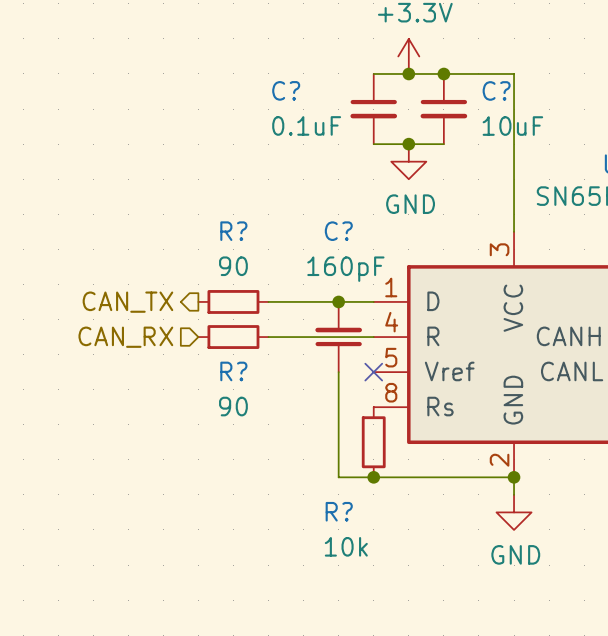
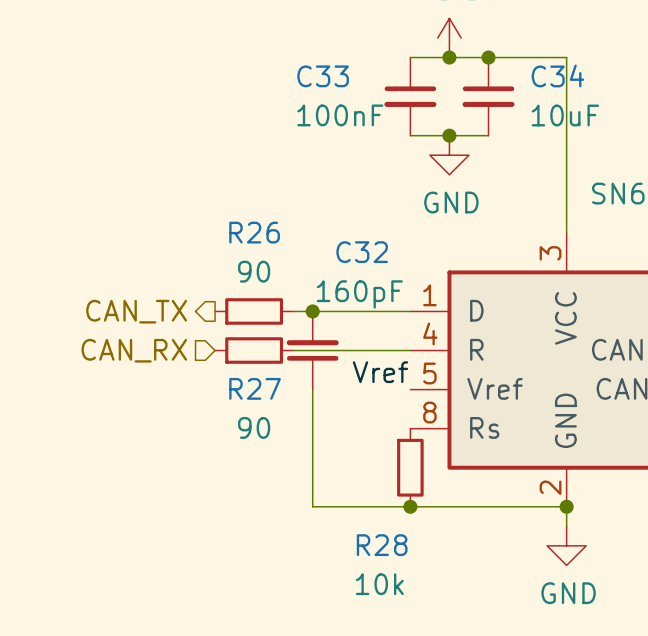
C? name: C? (286, 90) -> C33 (323, 76)
C? name: C? (496, 90) -> C34 (557, 75)
C? value: 0.1uF (306, 125) -> 100nF (340, 115)
R? name: R? (233, 231) -> R26 (254, 232)
junction position: (338, 301) -> (312, 311)
C32: none -> 160pF (312, 350)
C?: 160pF (338, 337) -> none
label: none -> Vref (380, 372)
R? name: R? (233, 371) -> R27 (255, 388)
wire: (338, 372) (338, 477) -> (312, 389) (312, 506) (371, 506)
no-connect mark: (373, 372) -> none
R? name: R? (339, 511) -> R28 (382, 545)

